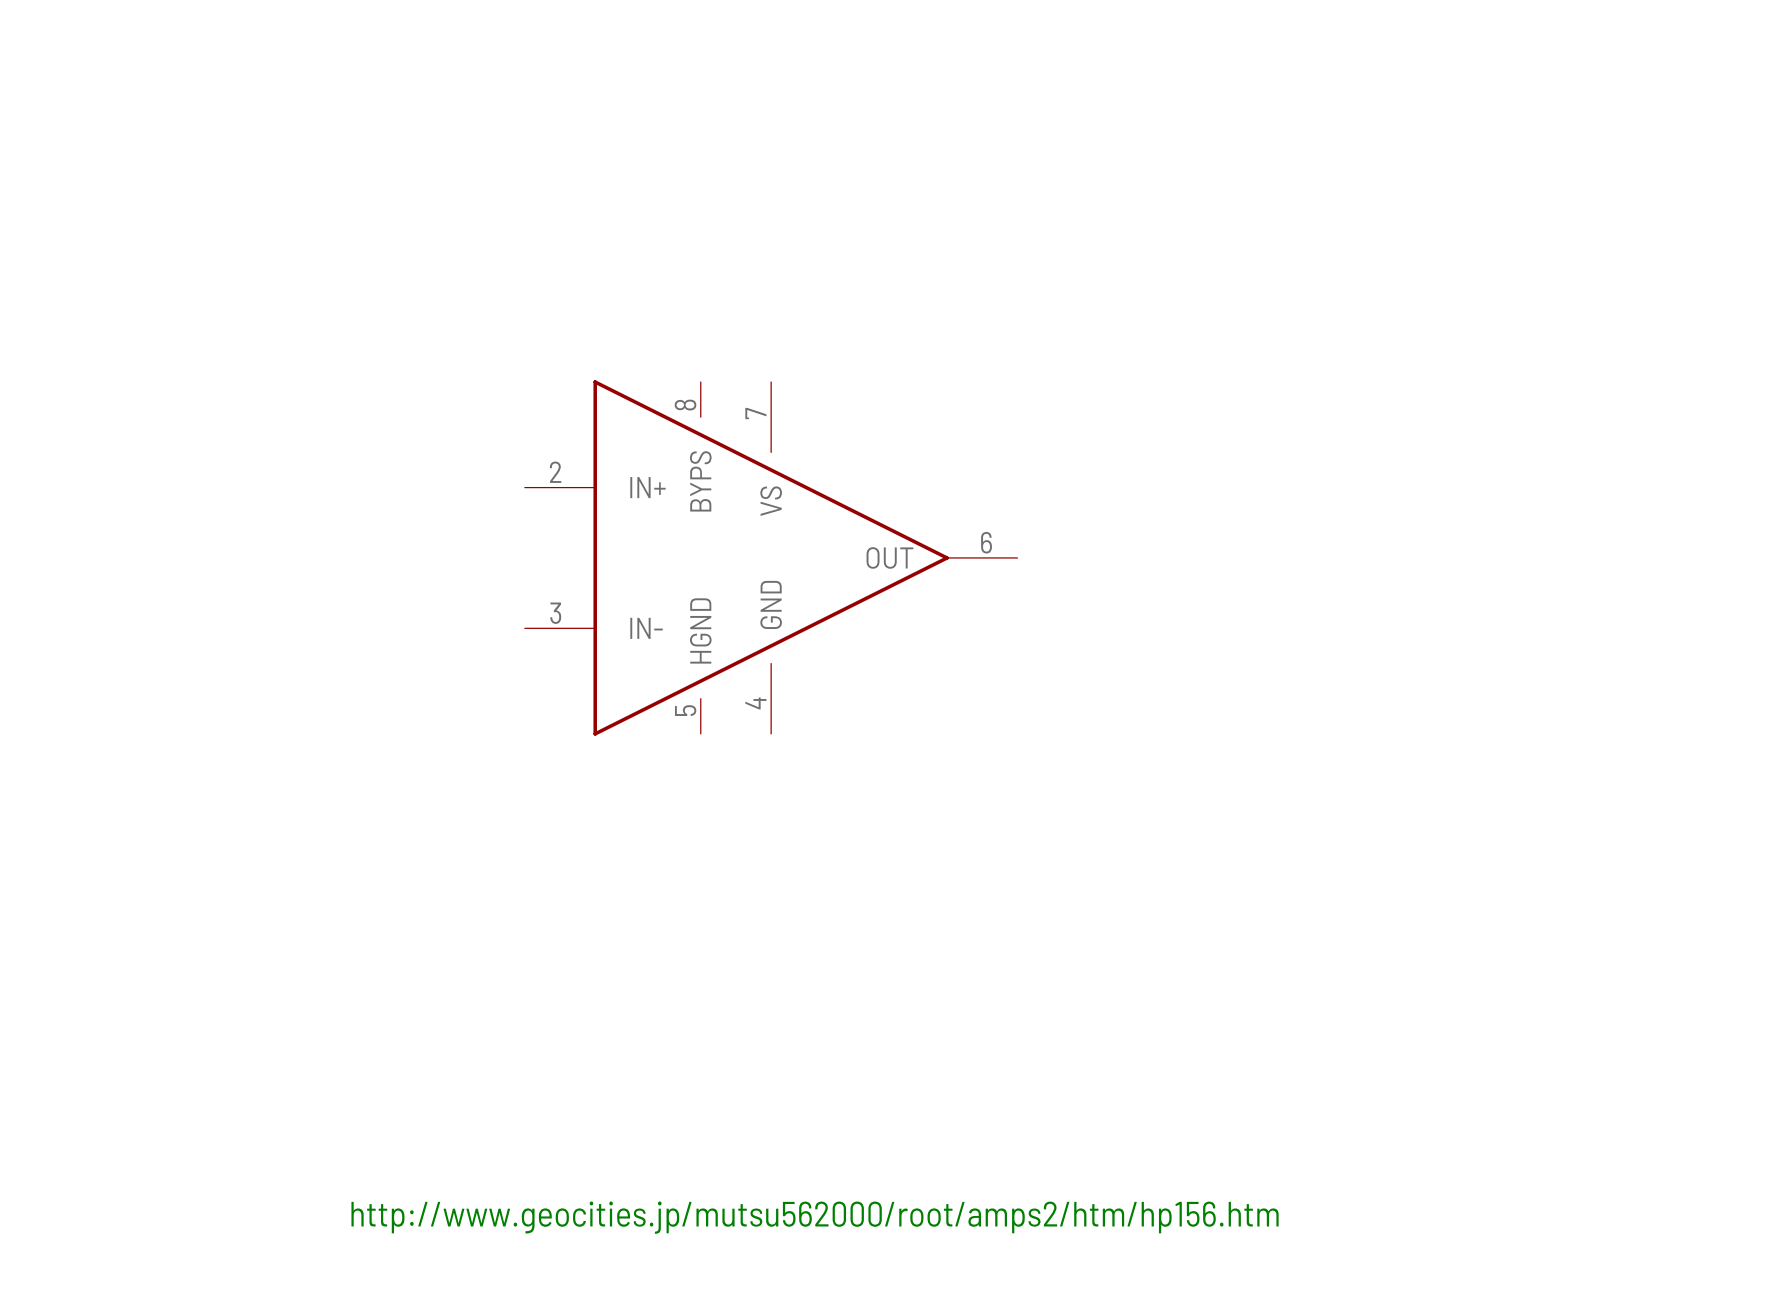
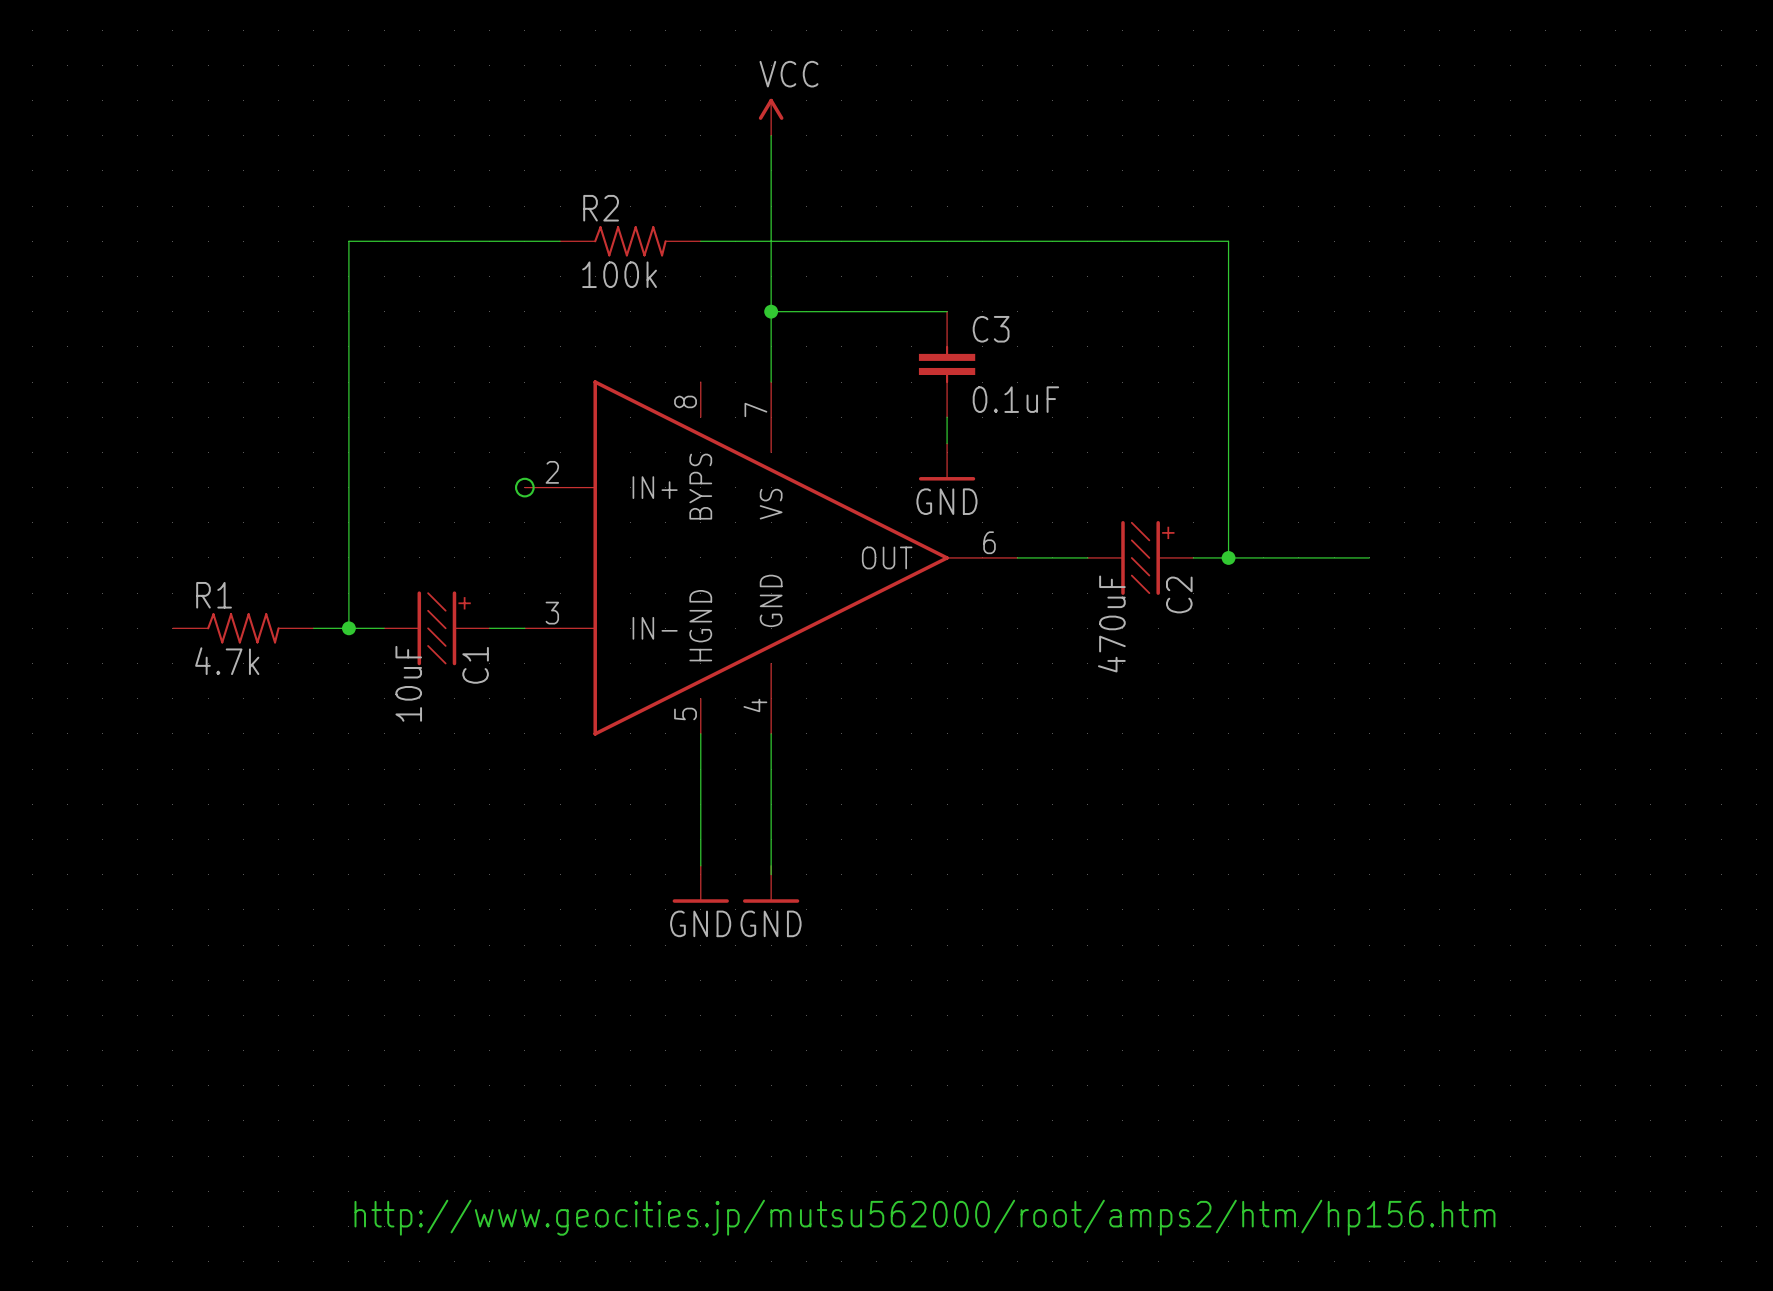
power symbol: none -> VCC (771, 117)
wire: none -> (771, 135) (771, 382)
wire: none -> (560, 241) (348, 241) (348, 628)
R2: none -> 100k (630, 241)
wire: none -> (700, 241) (1228, 241) (1228, 557)
wire: none -> (771, 311) (947, 311)
junction: none -> (771, 311)
C3: none -> 0.1uF (947, 364)
wire: none -> (947, 417) (947, 443)
power symbol: none -> GND (947, 462)
drawing: none -> [514, 477, 535, 498]
wire: none -> (1017, 557) (1087, 557)
C2: none -> 470uF (1140, 557)
wire: none -> (1193, 557) (1369, 557)
junction: none -> (1228, 557)
R1: none -> 4.7k (243, 628)
wire: none -> (313, 628) (384, 628)
junction: none -> (348, 628)
C1: none -> 10uF (436, 628)
wire: none -> (489, 628) (524, 628)
wire: none -> (700, 733) (700, 865)
wire: none -> (771, 733) (771, 874)
power symbol: none -> GND (700, 884)
power symbol: none -> GND (771, 884)

